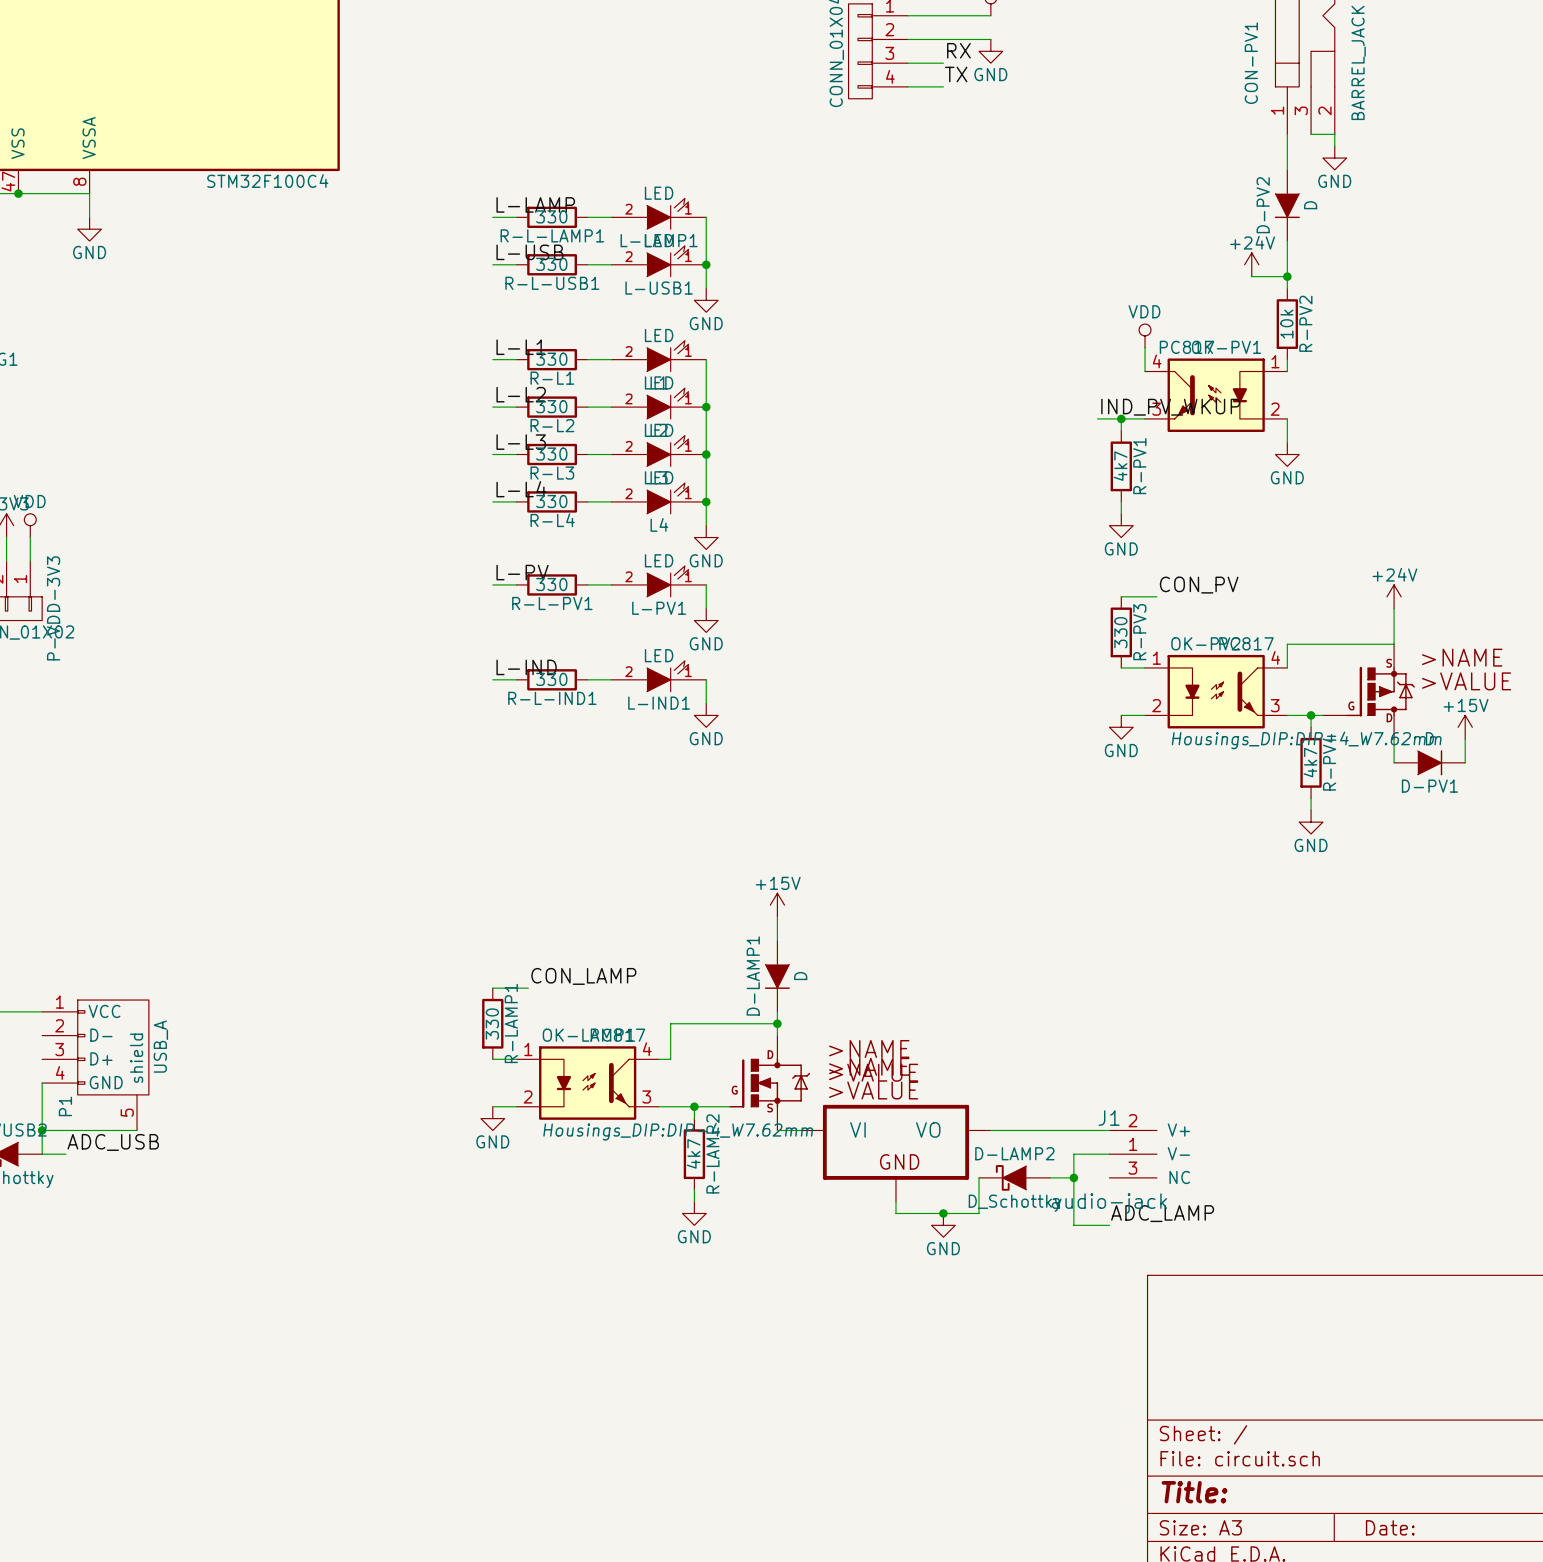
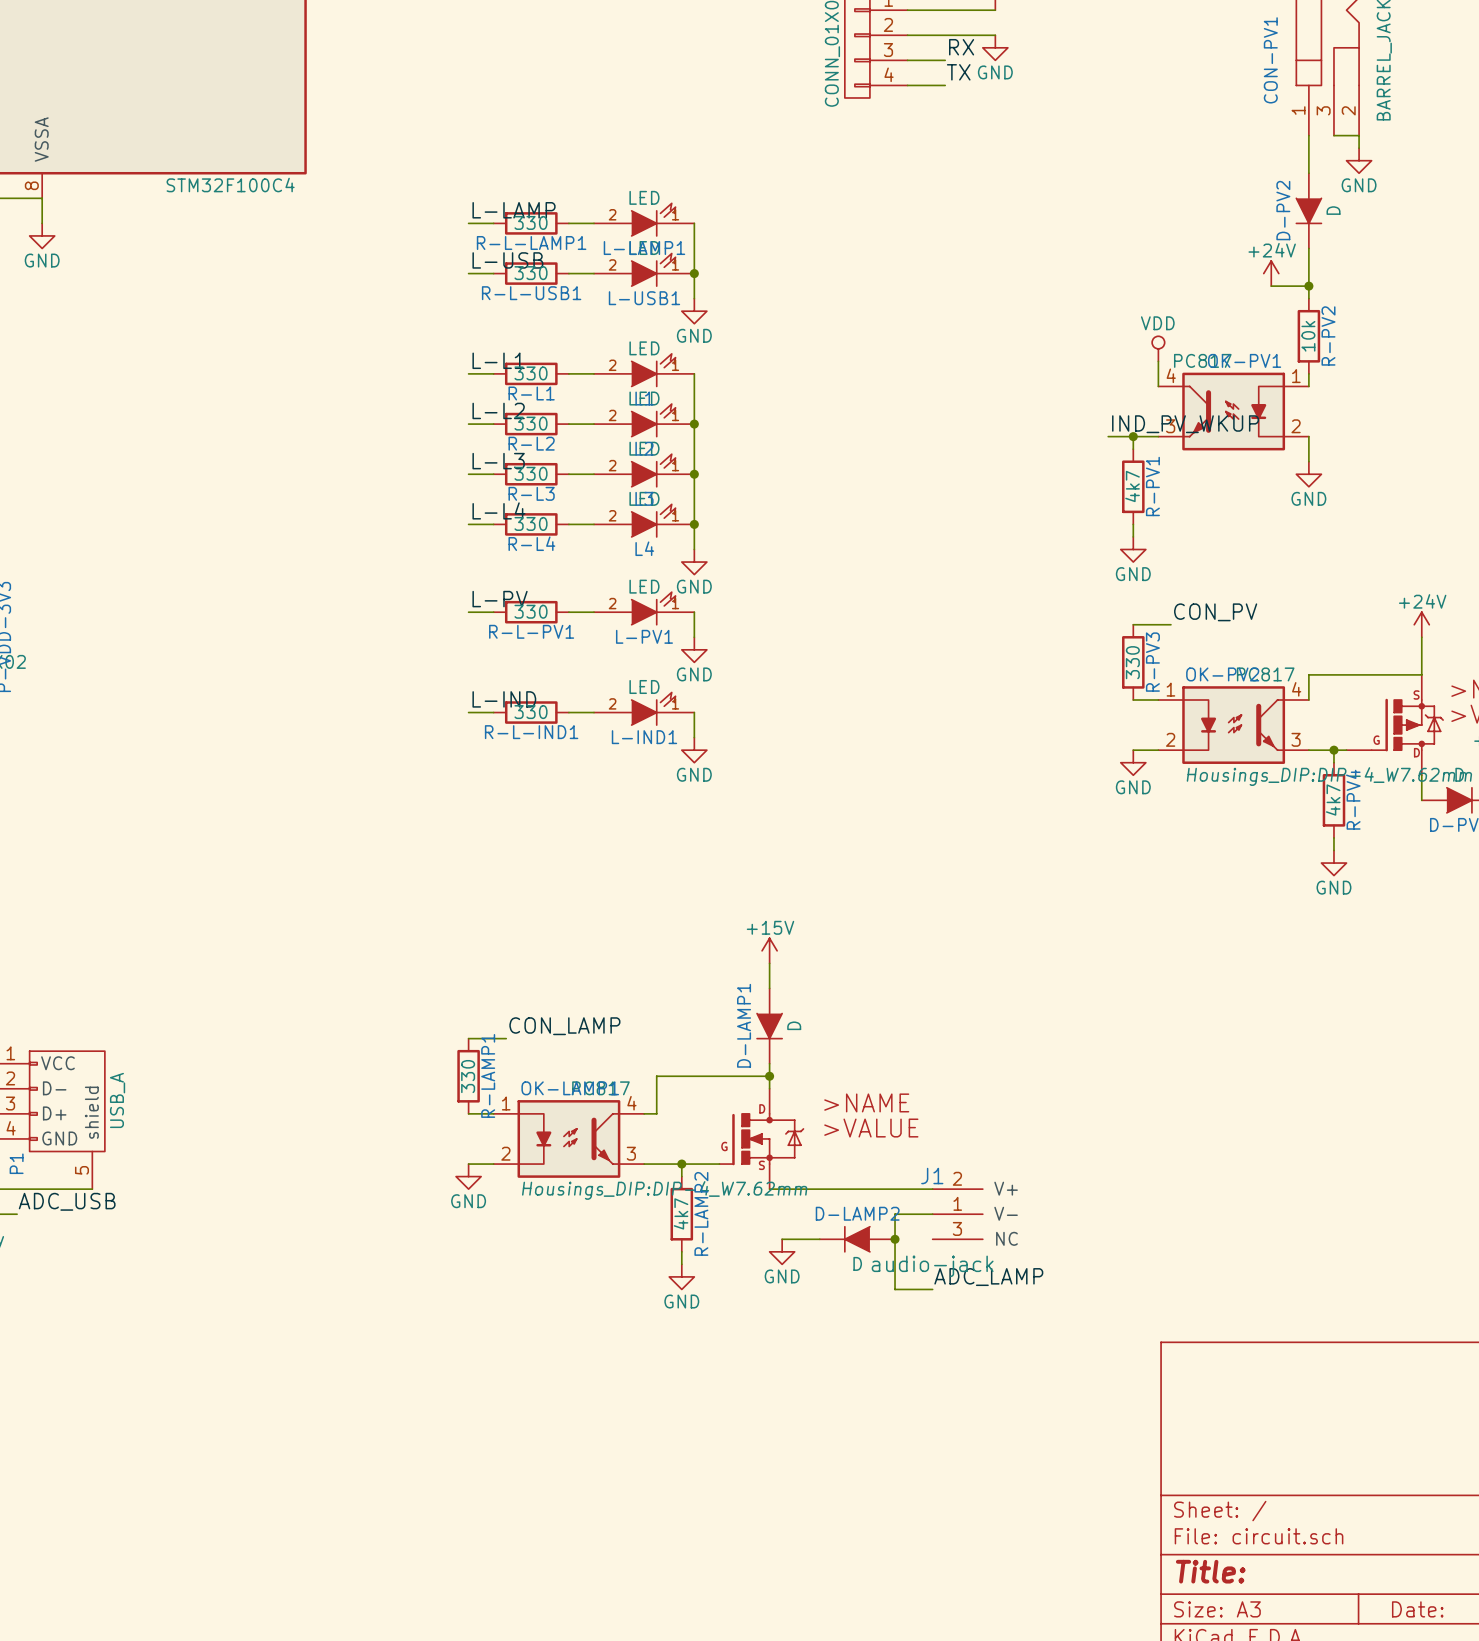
wire: none -> (794, 1189) (932, 1189)
wire: (990, 1130) (1109, 1130) -> none
part: (895, 1153) -> none
wire: none -> (932, 1214) (895, 1214) (895, 1264)
wire: (1109, 1154) (1073, 1154) (1073, 1225) (1109, 1225) -> none
J1 position: (1133, 1154) -> (957, 1214)
D-LAMP2 symbol: [979, 1165, 1051, 1191] -> [819, 1226, 896, 1253]
wire: none -> (782, 1239) (819, 1239)
junction: none -> (895, 1239)
wire: (979, 1177) (979, 1213) (895, 1213) -> (932, 1289) (895, 1289) (895, 1276)
wire: (1050, 1177) (1073, 1177) -> none
junction: (1073, 1177) -> none
D-LAMP2 value: D_Schottky (1015, 1203) -> D (857, 1263)
junction: (943, 1213) -> none
label position: ADC_LAMP (1162, 1213) -> ADC_LAMP (988, 1277)
power symbol position: GND (943, 1225) -> GND (782, 1251)

